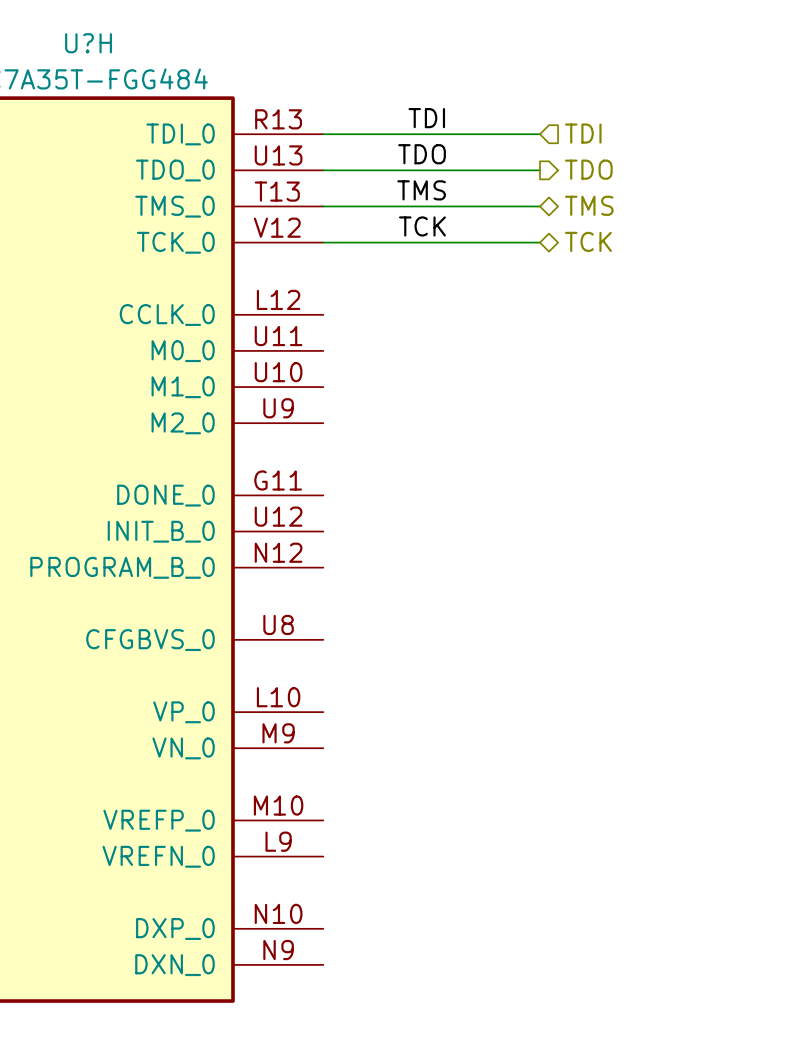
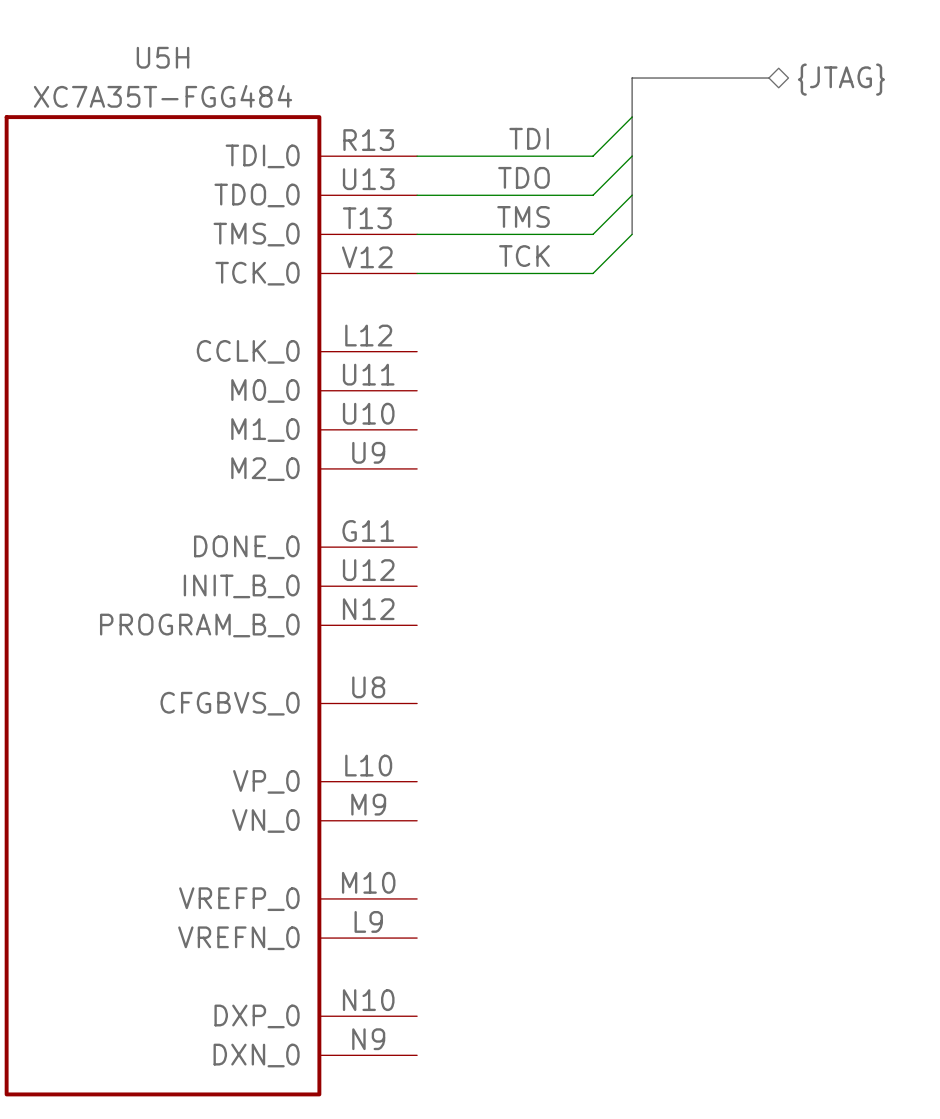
U?H name: U?H (88, 43) -> U5H (163, 57)
bus: none -> (768, 78) (632, 78) (632, 234)
hierarchical label: none -> {JTAG} (841, 79)
hierarchical label: TDI (583, 133) -> none
wire: (485, 134) (539, 134) -> (593, 156) (632, 117)
hierarchical label: TDO (588, 169) -> none
wire: (485, 170) (539, 170) -> (593, 195) (632, 156)
hierarchical label: TMS (589, 205) -> none
wire: (485, 206) (539, 206) -> (593, 234) (632, 195)
hierarchical label: TCK (588, 241) -> none
wire: (485, 242) (539, 242) -> (593, 273) (632, 234)

